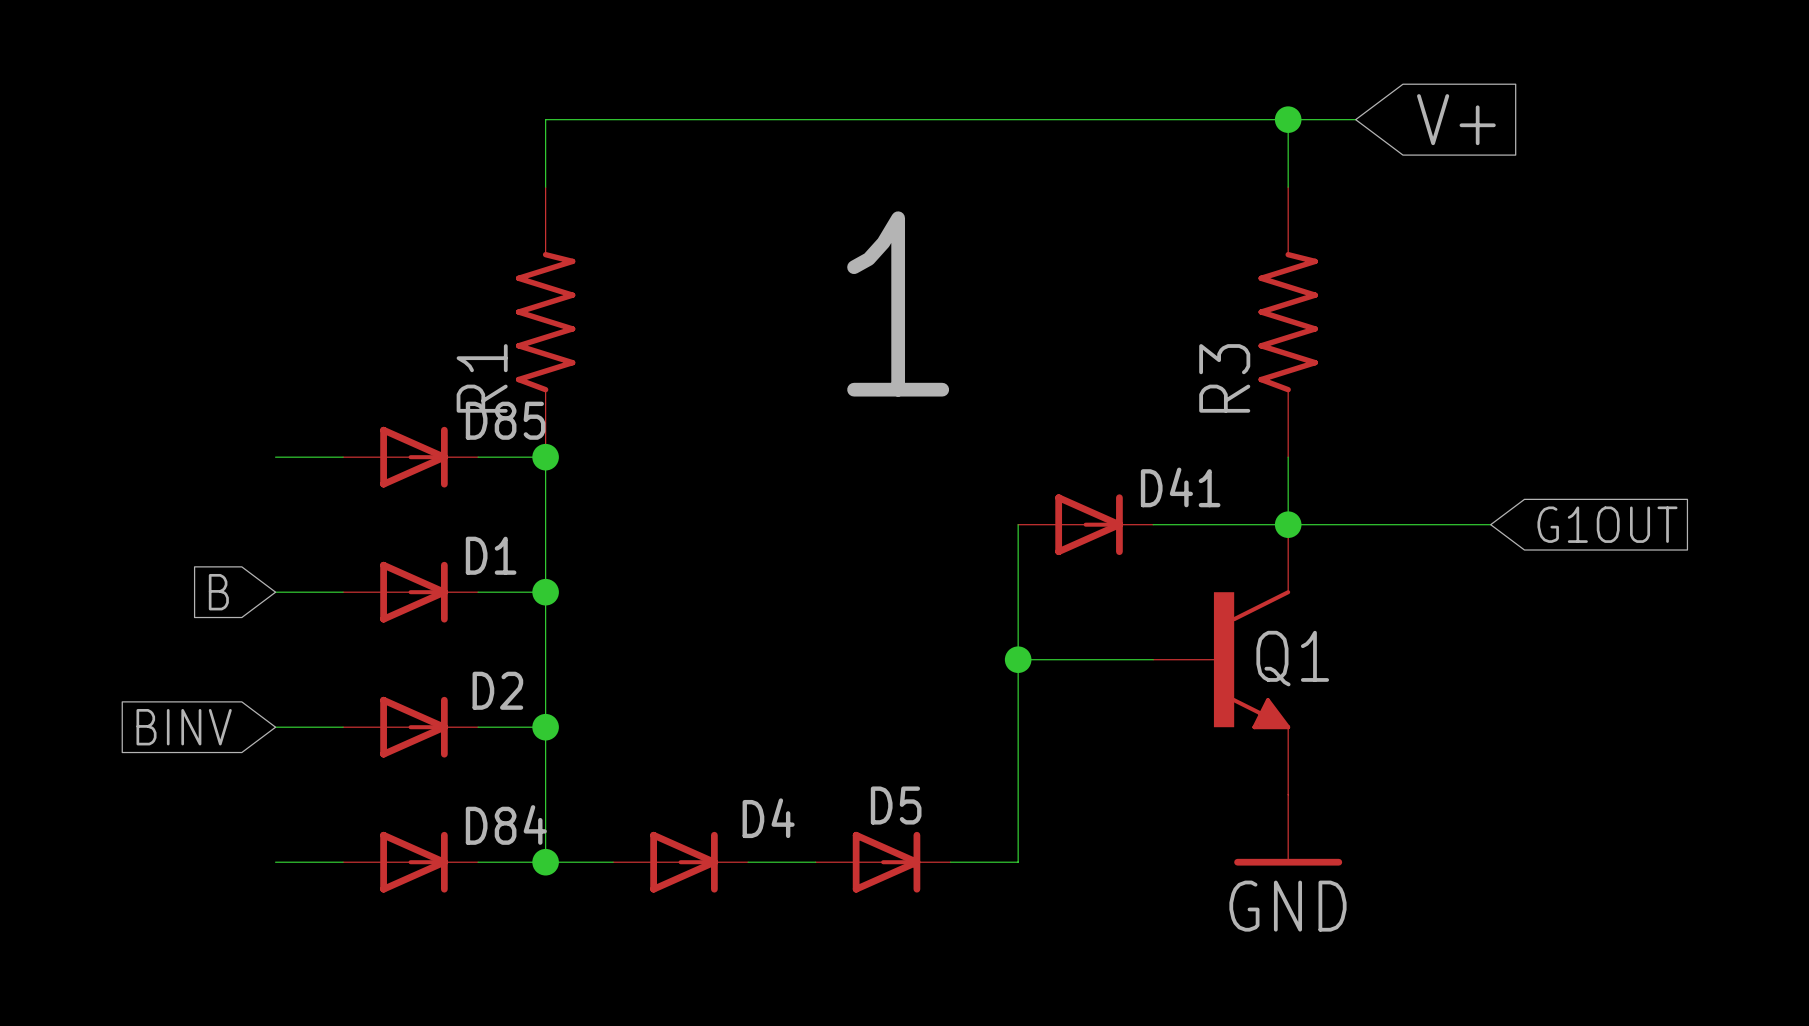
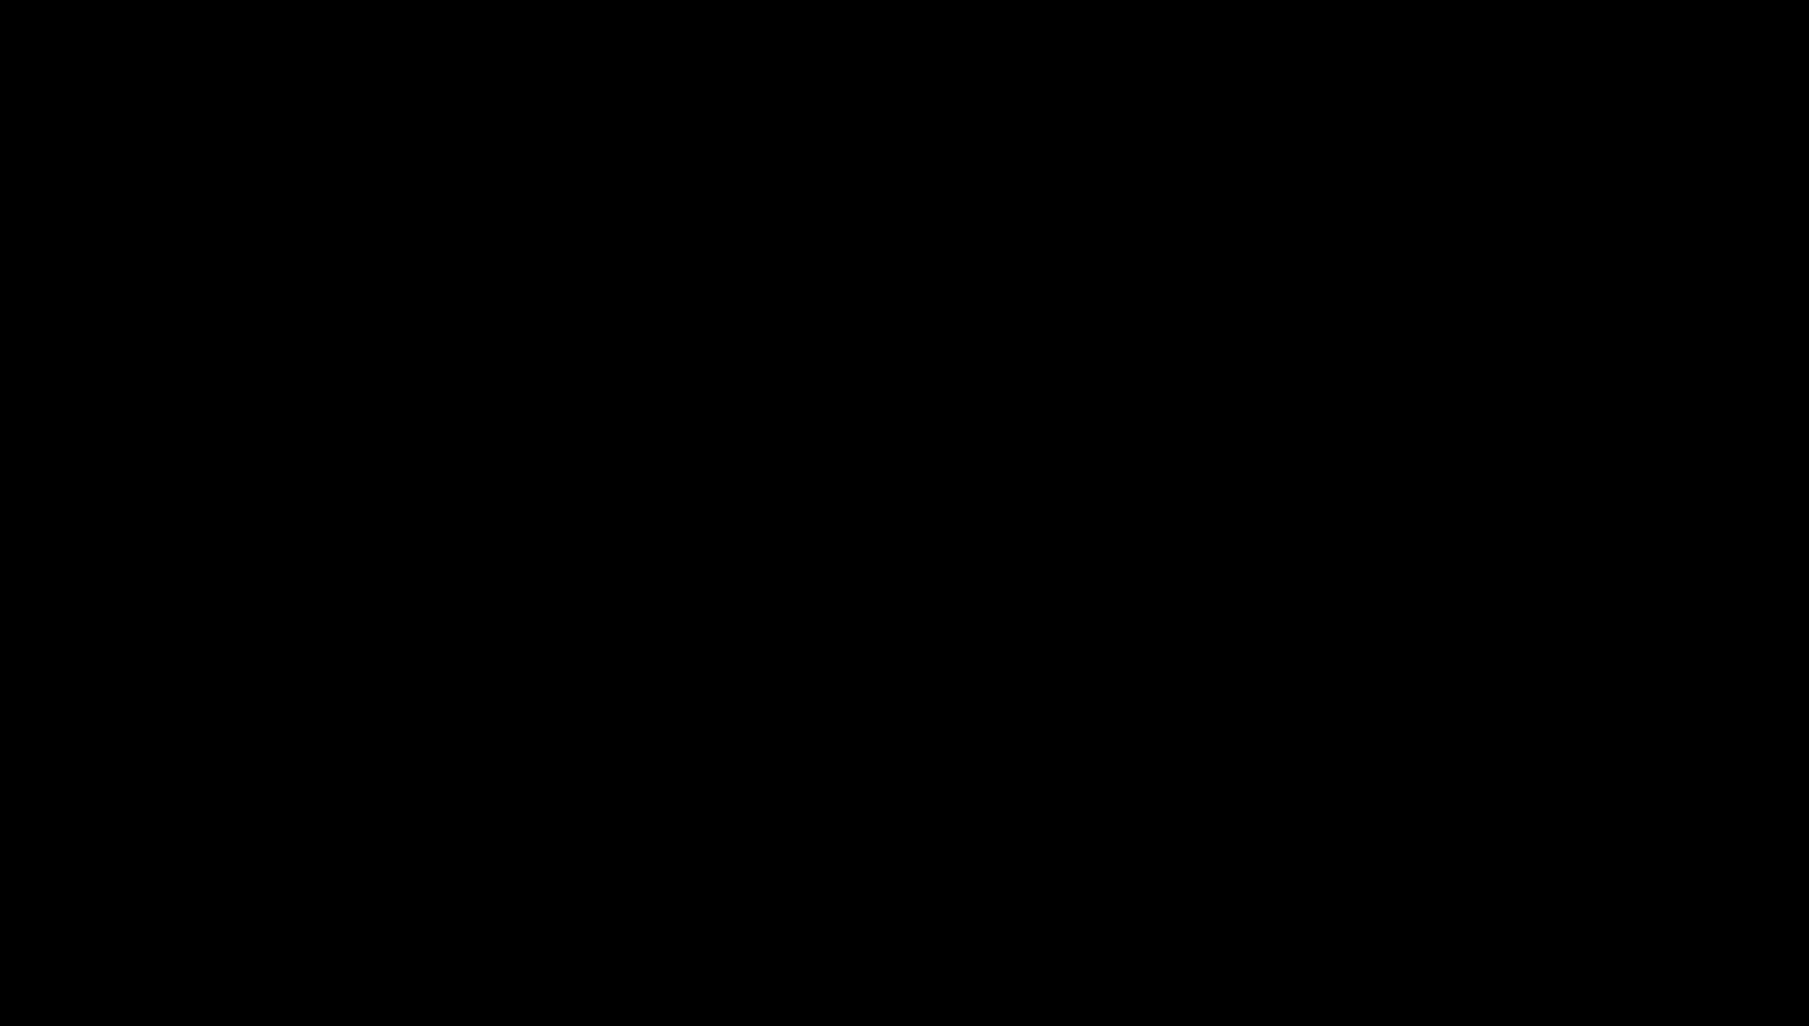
wire: (1288, 119) (1288, 187) -> none
junction: (1288, 119) -> none
wire: (1355, 119) (545, 119) (545, 187) -> none
global label: V+ (1456, 119) -> none
text: 1 (898, 303) -> none
R1: (545, 322) -> none
R3: (1288, 322) -> none
wire: (275, 457) (343, 457) -> none
D85: (410, 457) -> none
wire: (478, 457) (545, 457) (545, 862) -> none
junction: (545, 457) -> none
wire: (1288, 457) (1288, 524) -> none
wire: (1018, 524) (1018, 862) (950, 862) -> none
D41: (1085, 524) -> none
wire: (1153, 524) (1490, 524) -> none
junction: (1288, 524) -> none
global label: G1OUT (1607, 524) -> none
global label: B (218, 592) -> none
wire: (275, 592) (343, 592) -> none
D1: (410, 592) -> none
wire: (478, 592) (545, 592) -> none
junction: (545, 592) -> none
wire: (1018, 659) (1153, 659) -> none
junction: (1018, 659) -> none
Q1: (1221, 659) -> none
global label: BINV (184, 727) -> none
wire: (275, 727) (343, 727) -> none
D2: (410, 727) -> none
wire: (478, 727) (545, 727) -> none
junction: (545, 727) -> none
power symbol: GND (1288, 830) -> none
wire: (275, 862) (343, 862) -> none
D84: (410, 862) -> none
wire: (478, 862) (613, 862) -> none
junction: (545, 862) -> none
D4: (680, 862) -> none
wire: (748, 862) (815, 862) -> none
D5: (883, 862) -> none

